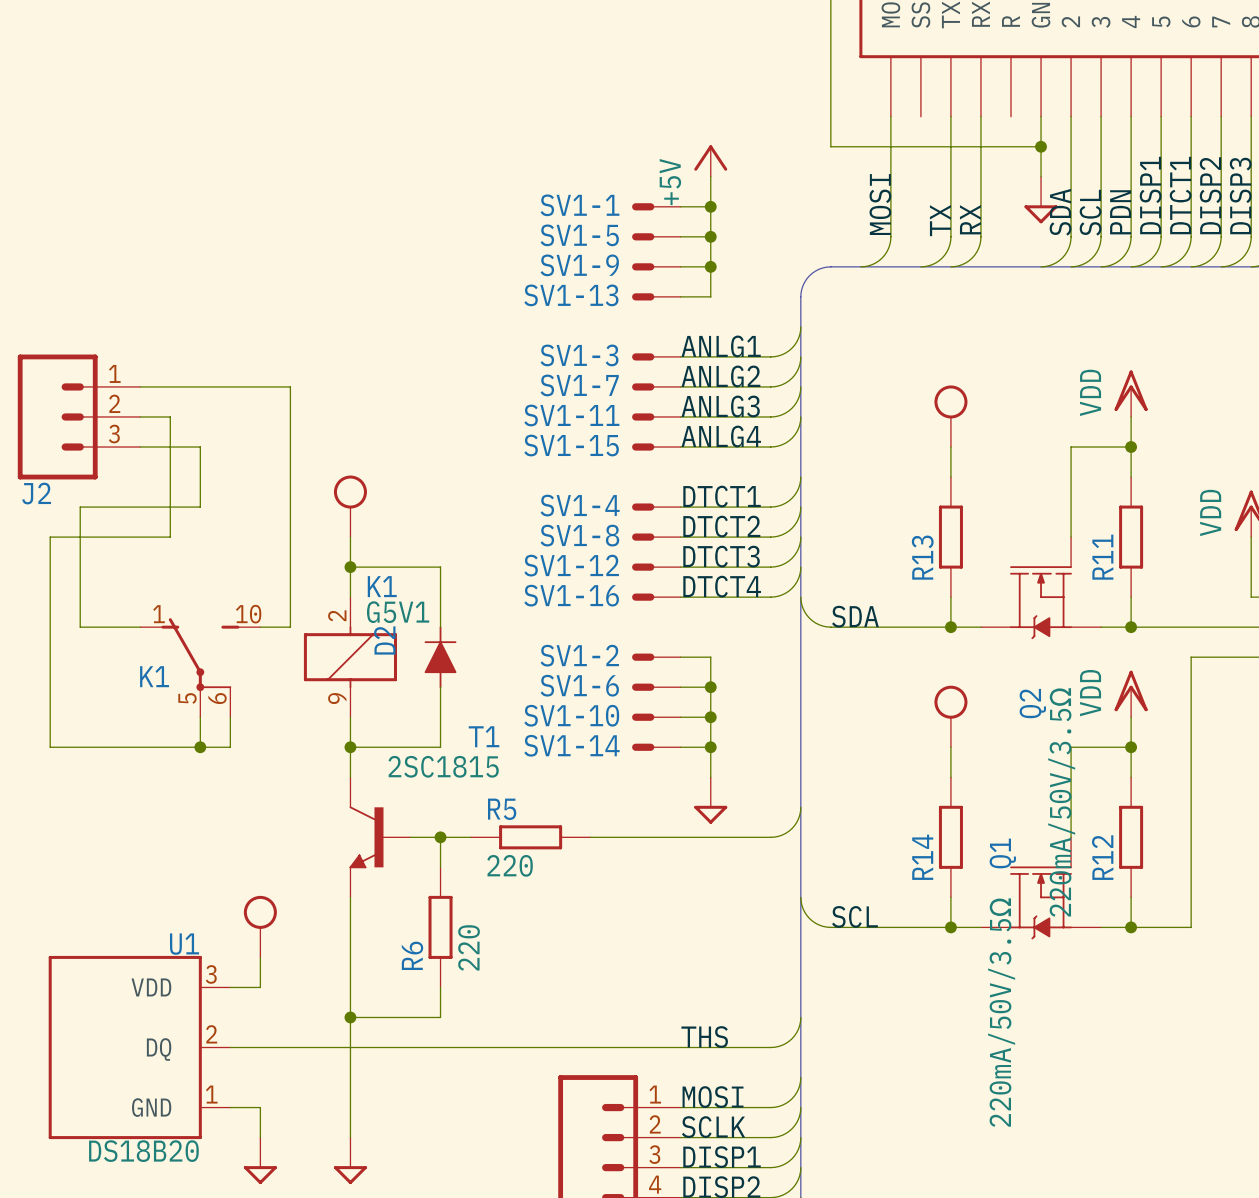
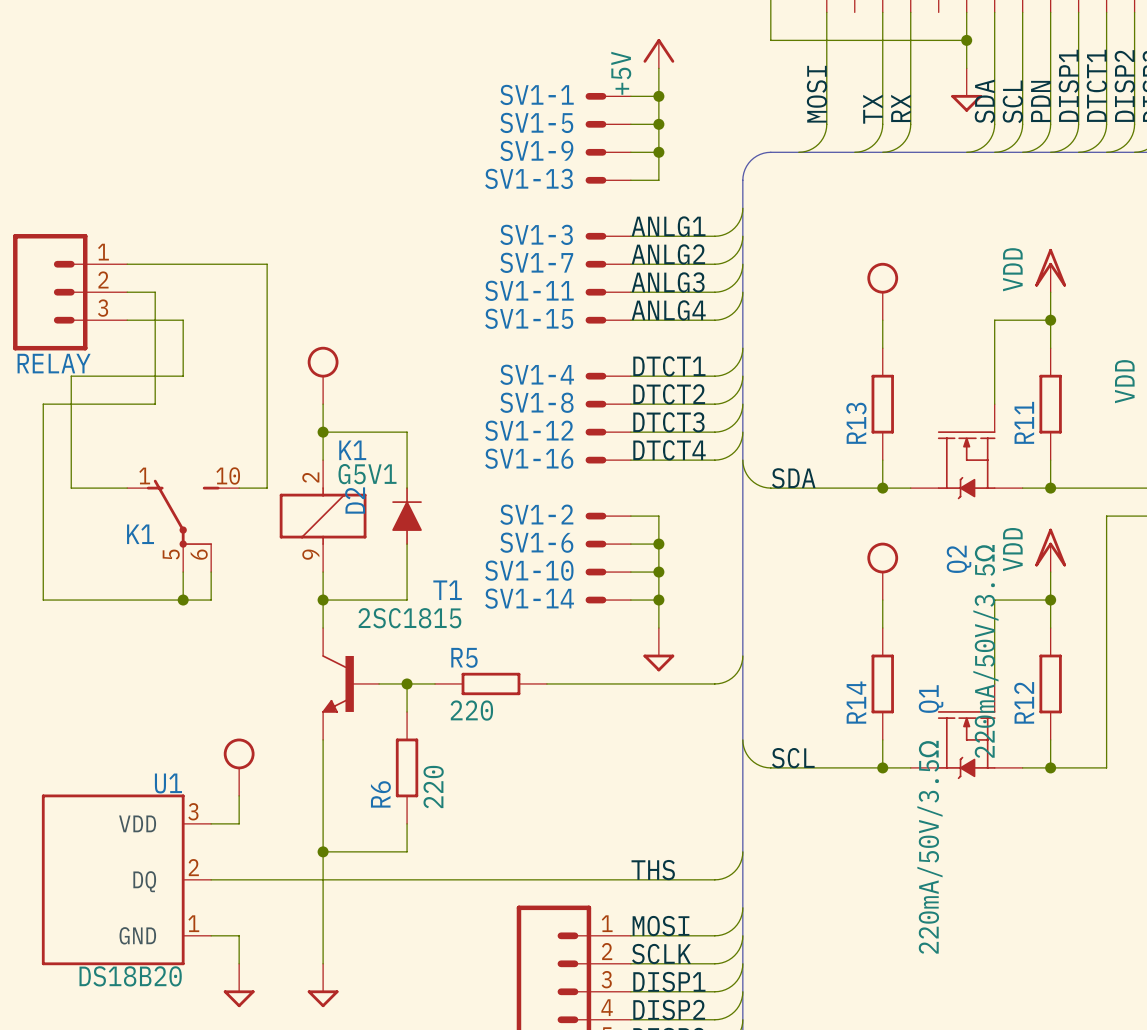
J2 name: J2 (36, 493) -> RELAY (54, 363)

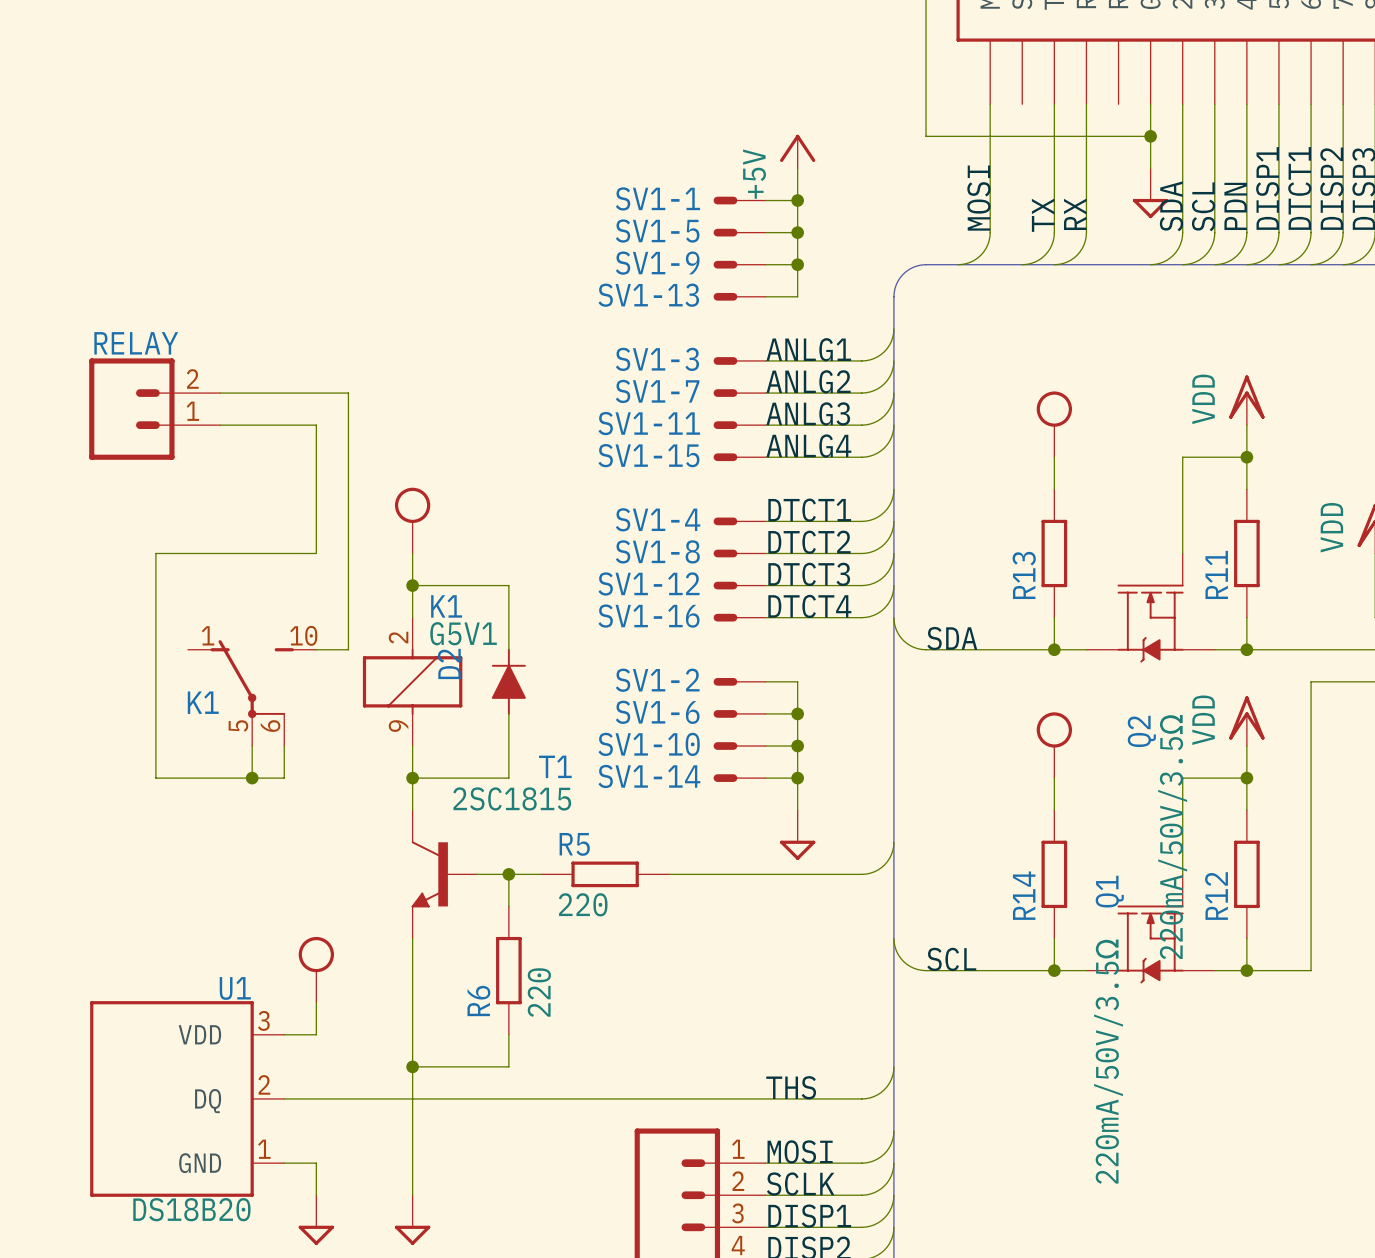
RELAY: none -> (154, 409)
RELAY: (70, 292) -> none
wire: (127, 292) (155, 292) (155, 404) -> (220, 425) (316, 425) (316, 553) (220, 553)
wire: (127, 320) (183, 320) (183, 376) (71, 376) (71, 488) (127, 488) -> none
wire: (99, 404) (43, 404) (43, 600) (99, 600) -> (155, 553) (155, 778)

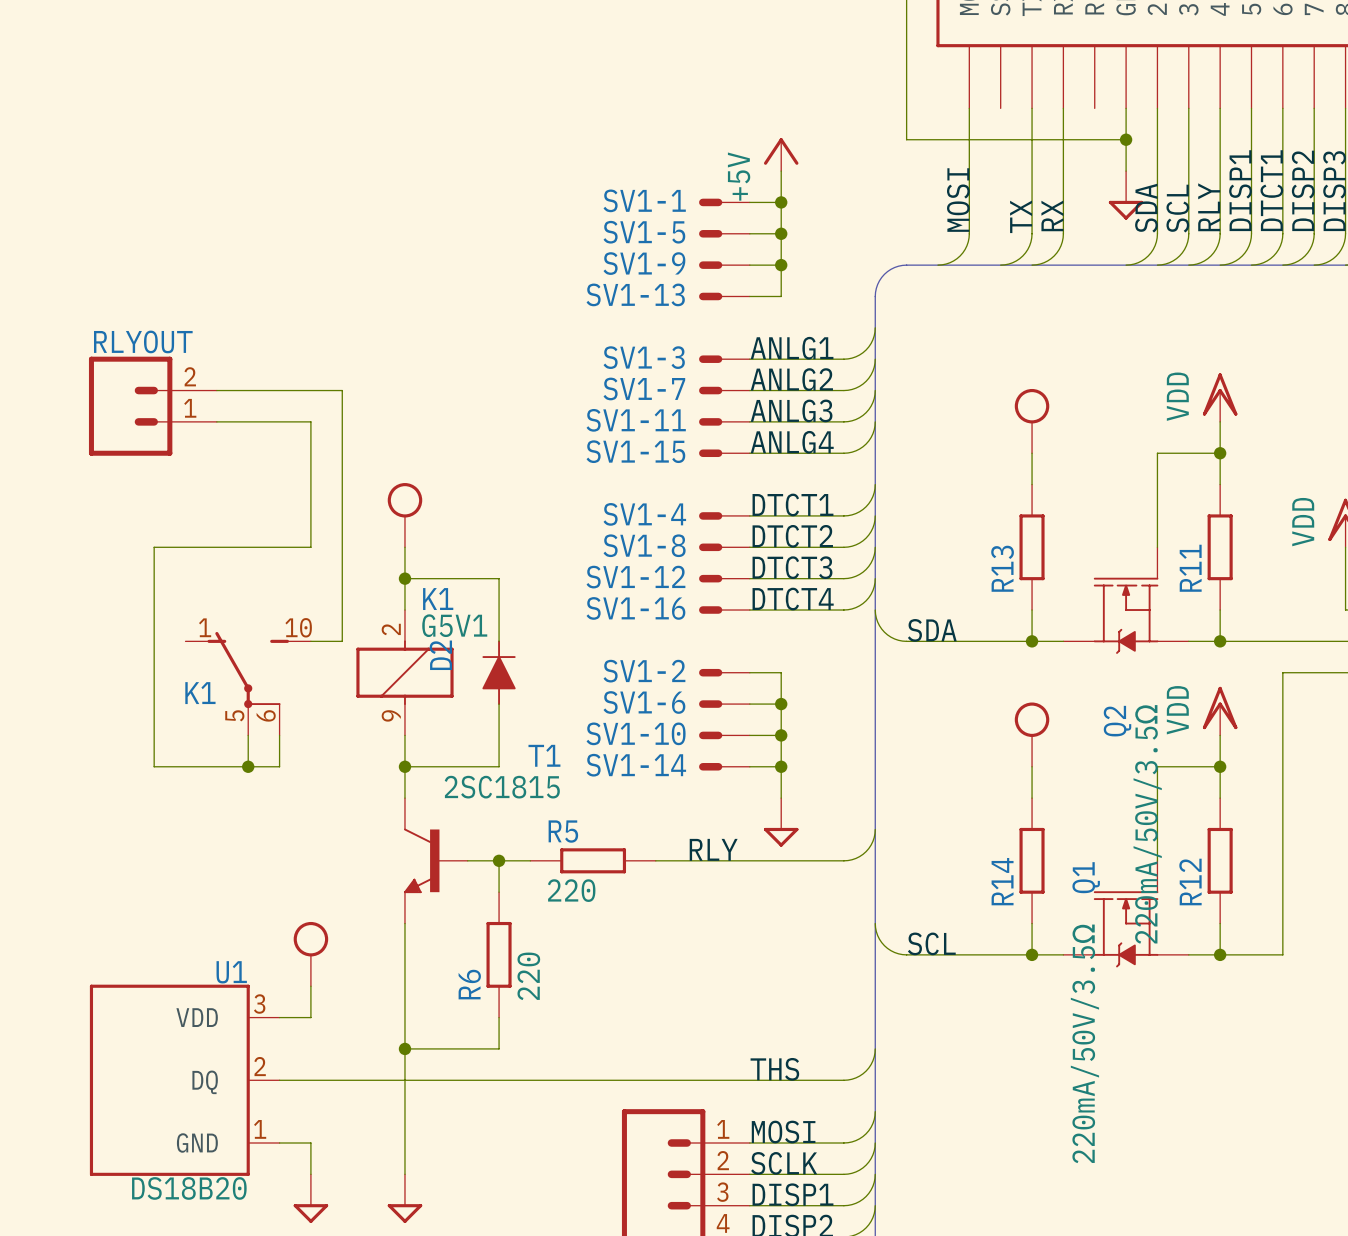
label: PDN (1235, 206) -> RLY (1209, 207)
RELAY name: RELAY (136, 343) -> RLYOUT (143, 341)
label: none -> RLY (713, 849)

